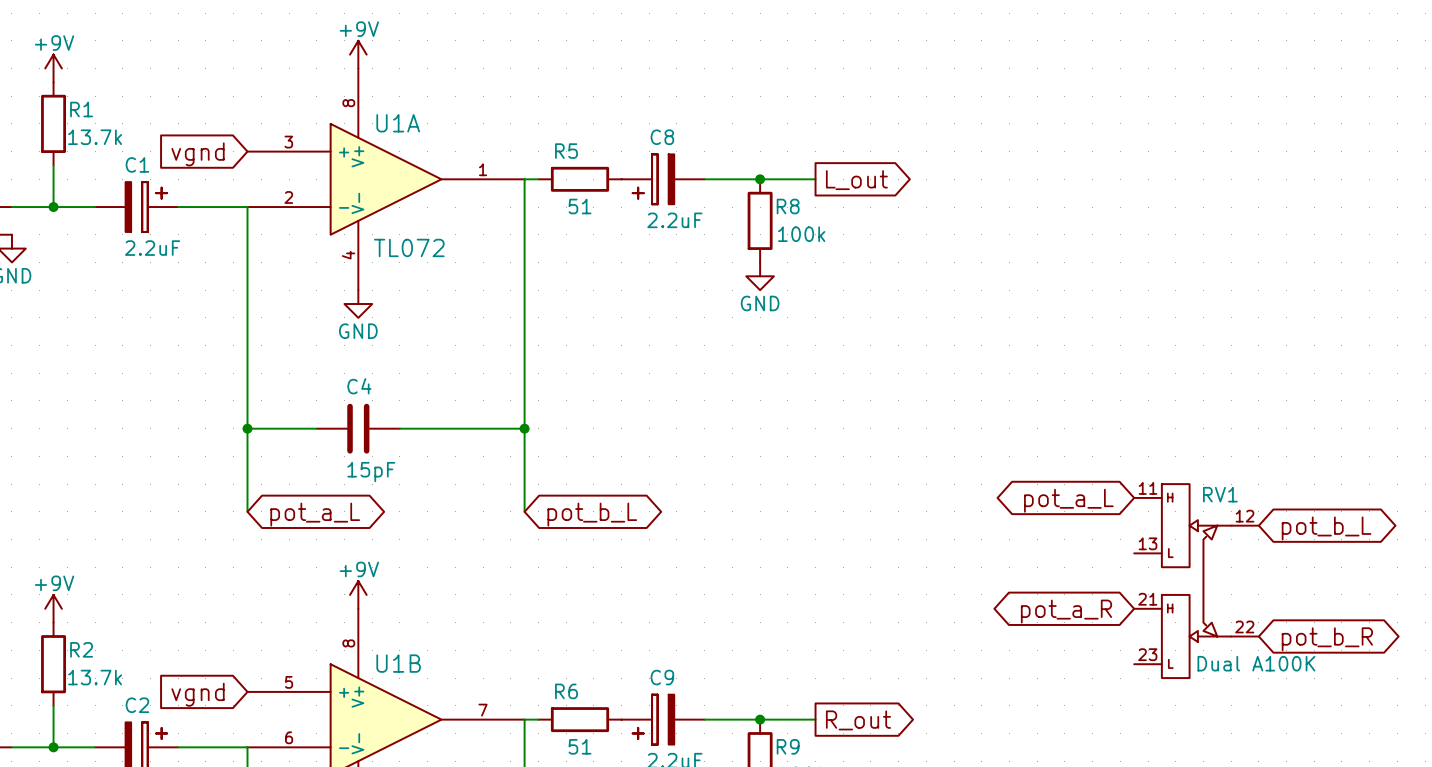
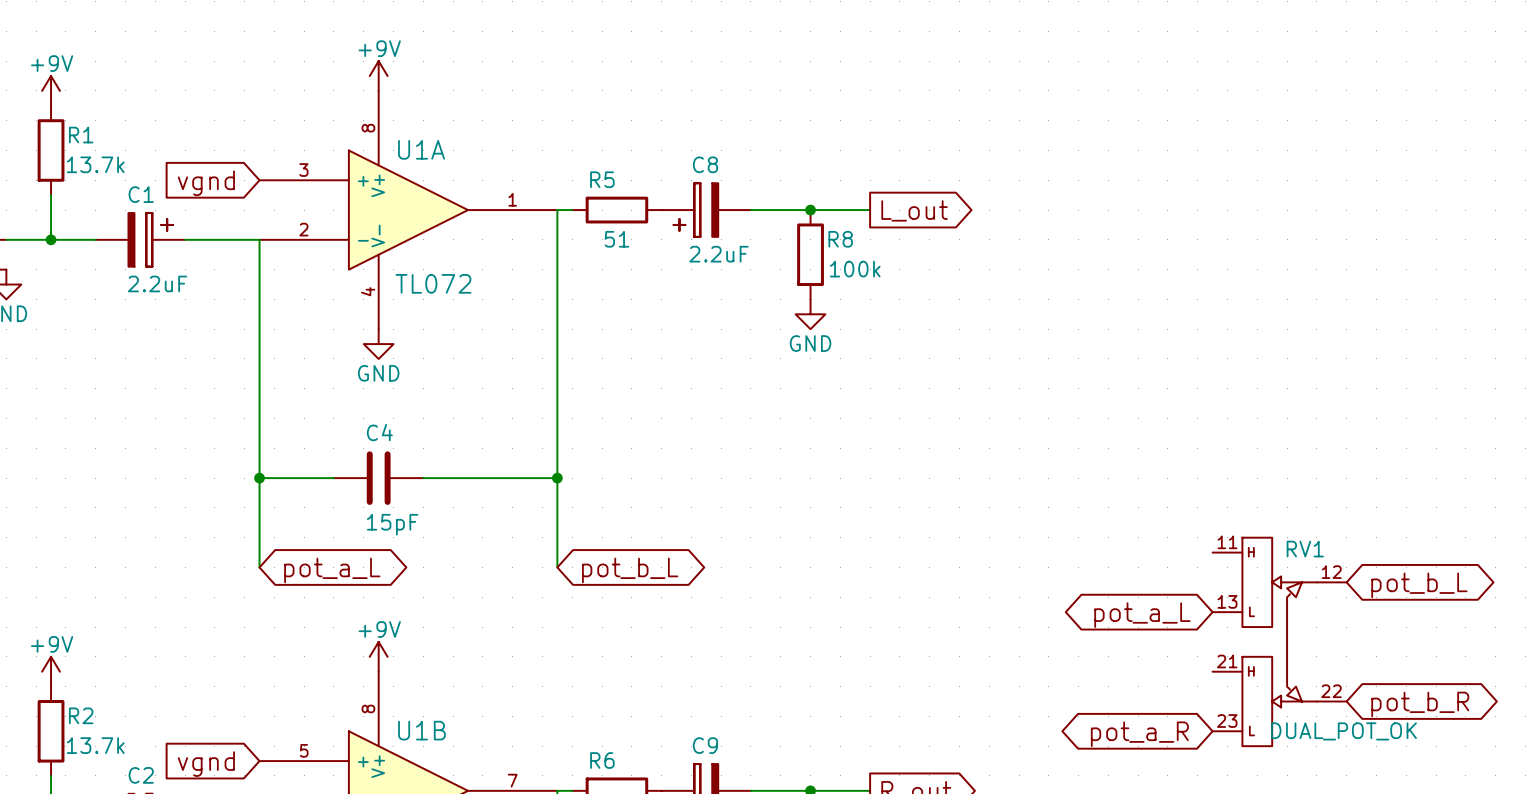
global label position: pot_a_L (1068, 500) -> pot_a_L (1142, 615)
global label position: pot_a_R (1066, 611) -> pot_a_R (1139, 734)
RV1 value: Dual A100K (1256, 663) -> DUAL_POT_OK (1344, 731)

